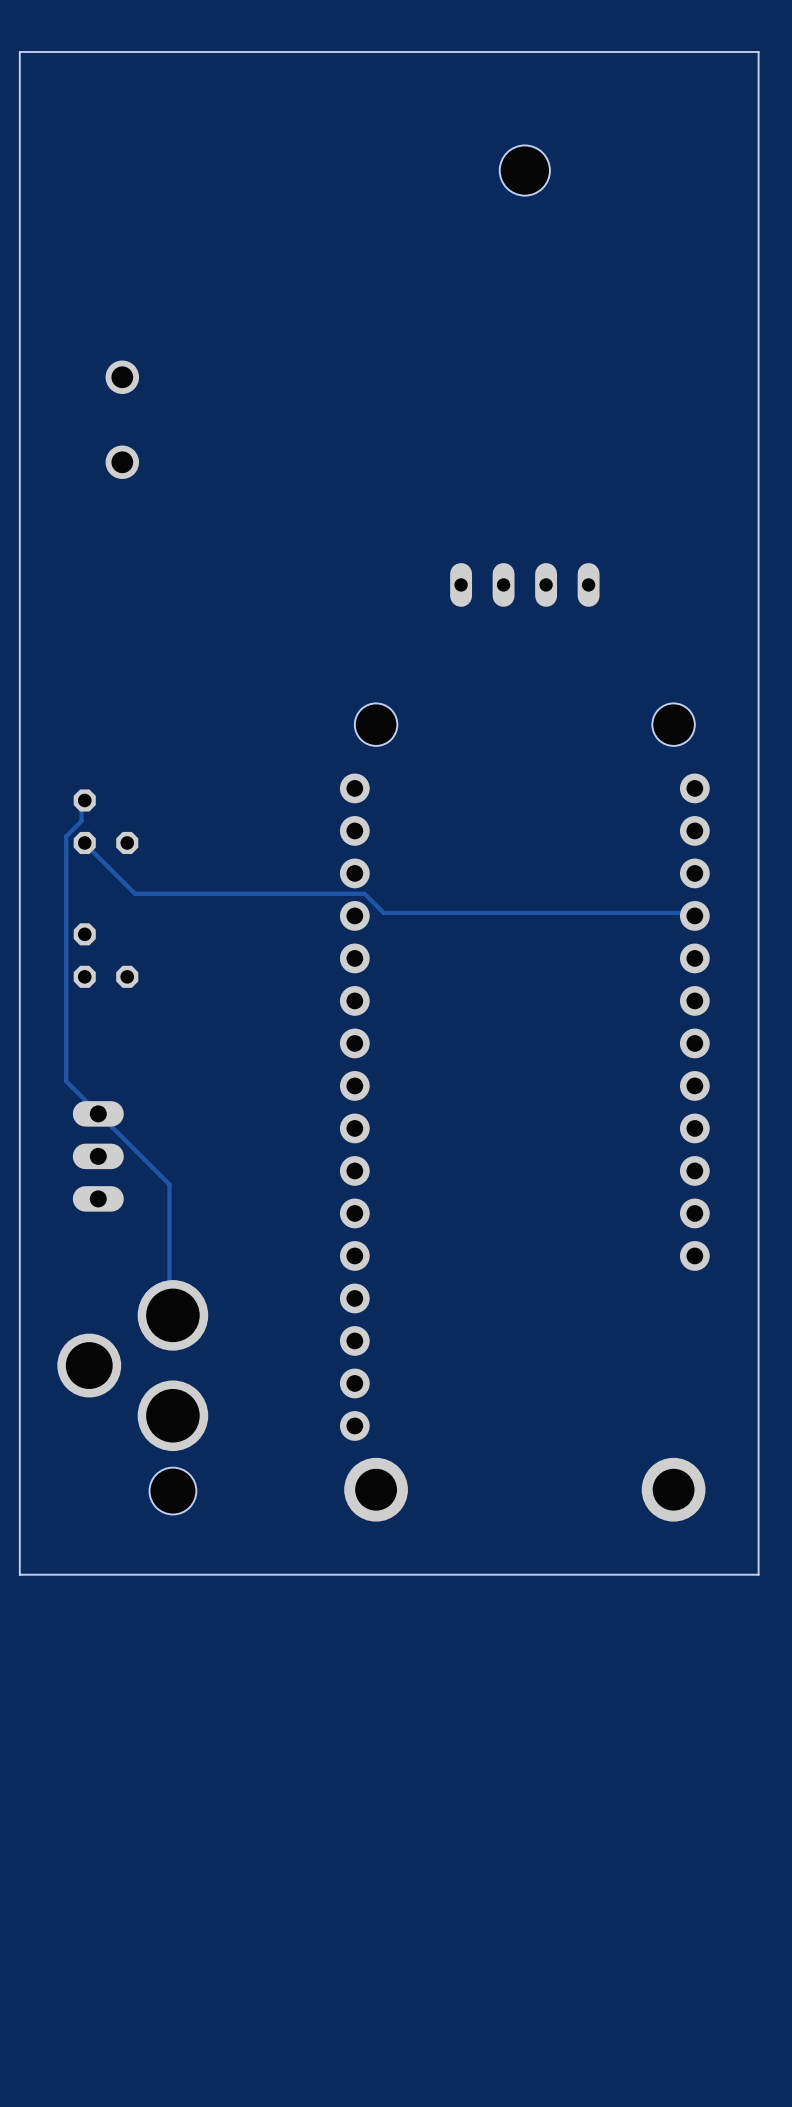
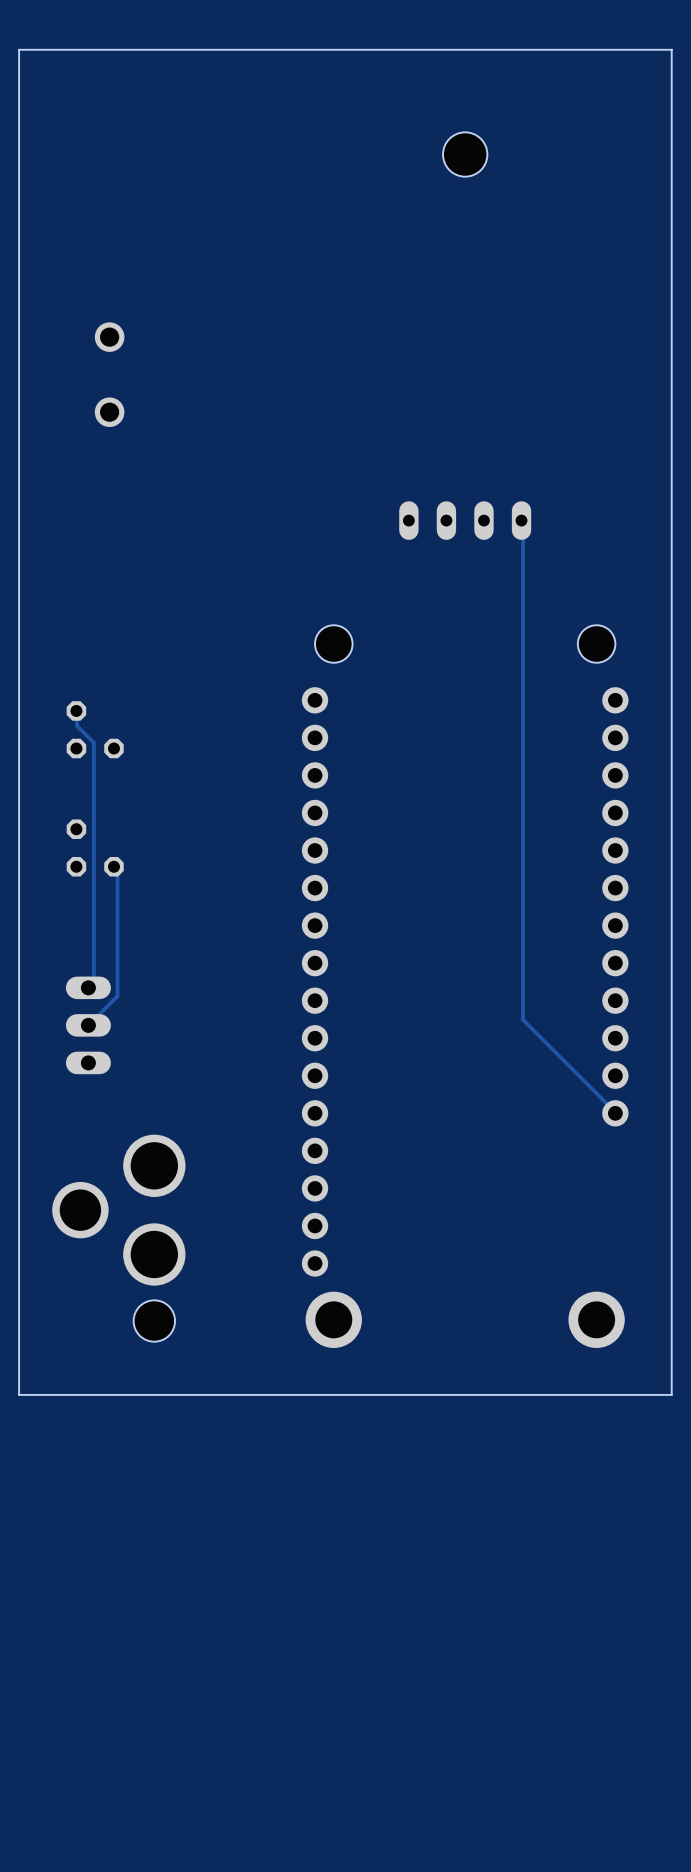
track: none -> (521, 520) (523, 1019) (615, 1113)
track: (84, 800) (81, 802) (81, 821) (66, 836) (66, 1081) (169, 1184) (169, 1314) (172, 1315) -> (76, 710) (76, 725) (93, 742) (93, 982) (88, 987)
track: (84, 842) (135, 893) (364, 893) (383, 912) (693, 912) (694, 915) -> none
track: none -> (113, 866) (117, 871) (117, 996) (88, 1025)

